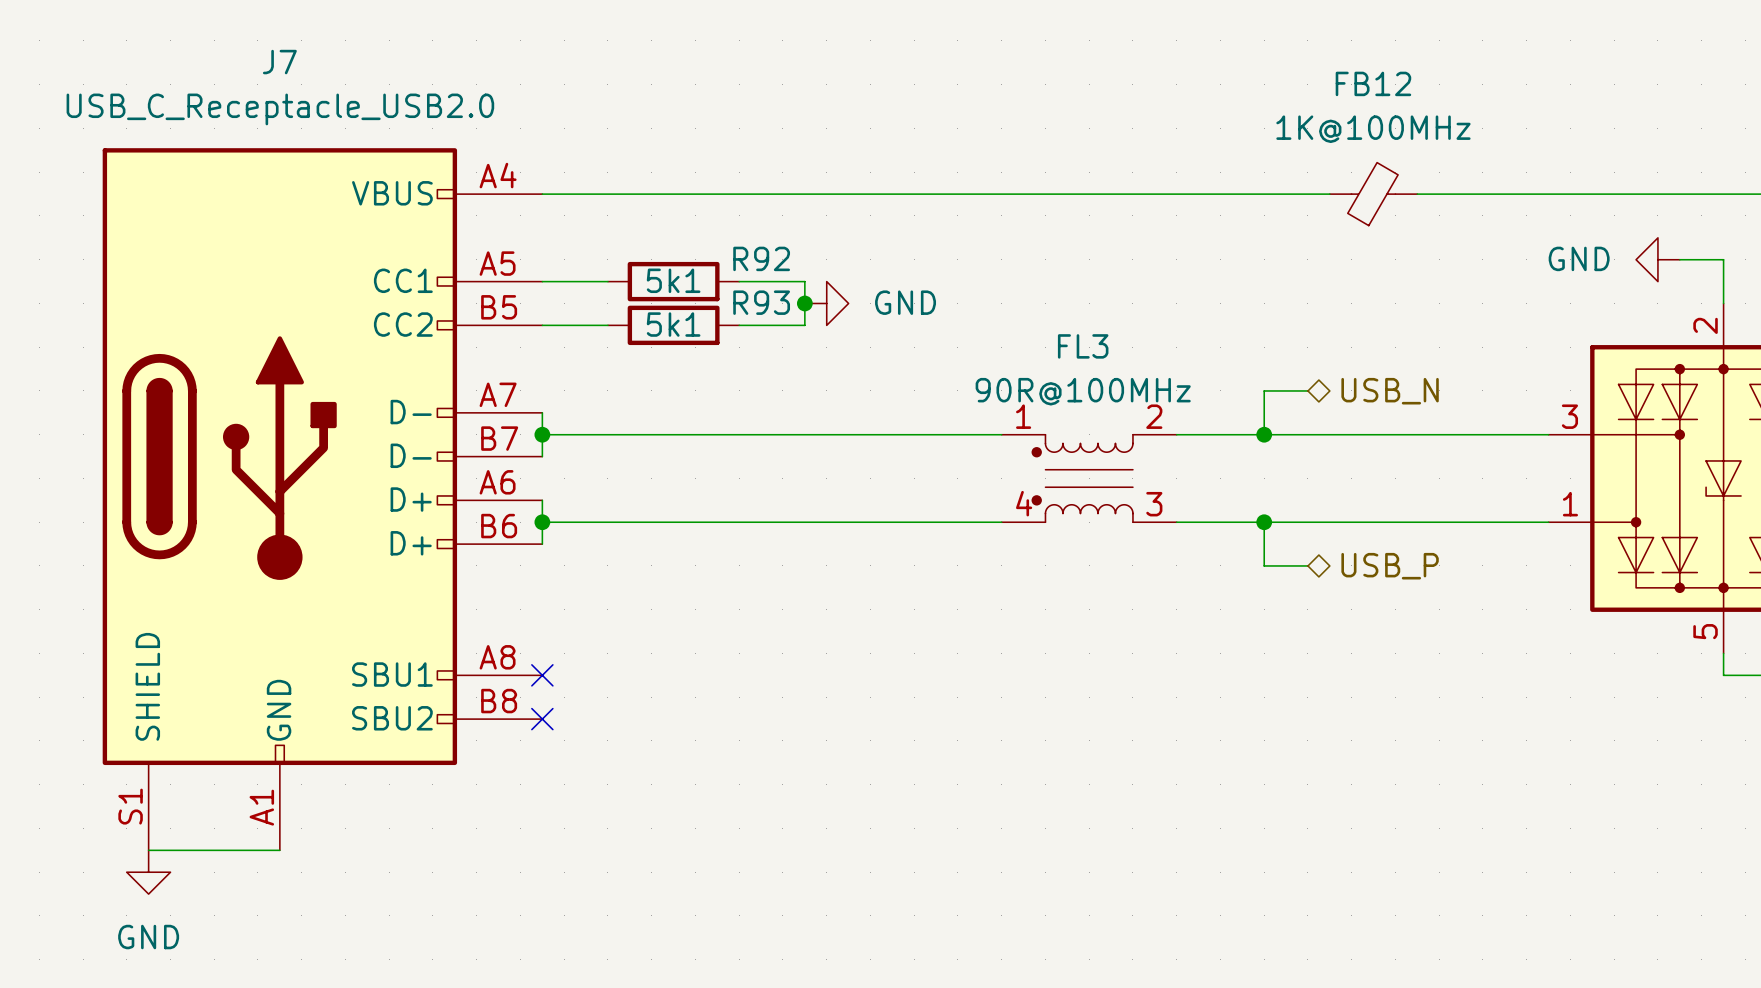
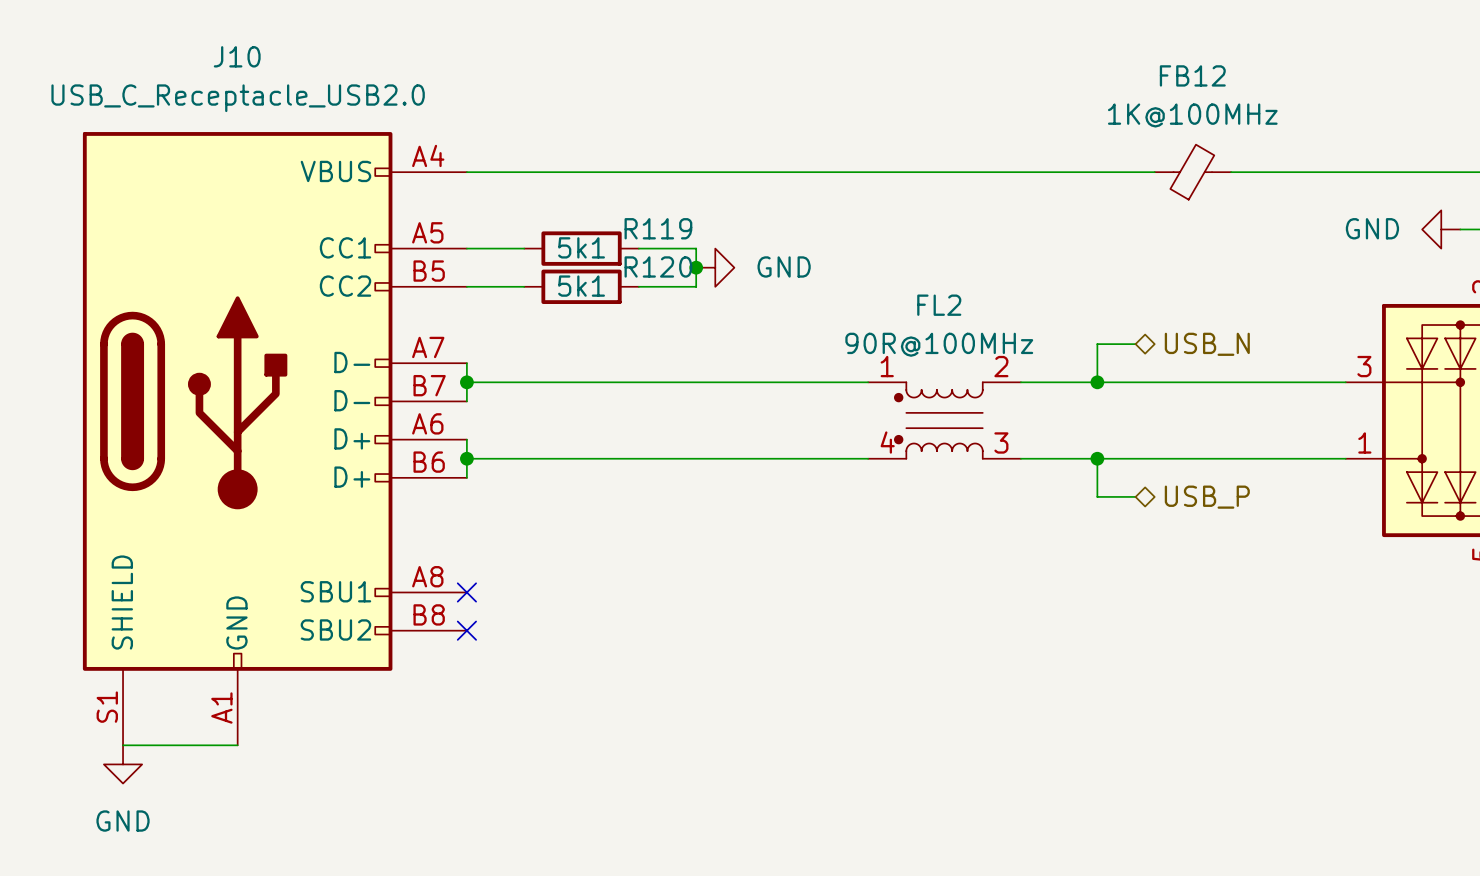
J7 name: J7 (279, 62) -> J10 (237, 56)
R92 name: R92 (761, 258) -> R119 (658, 228)
R93 name: R93 (761, 302) -> R120 (658, 266)
FL3 name: FL3 (1083, 346) -> FL2 (939, 305)

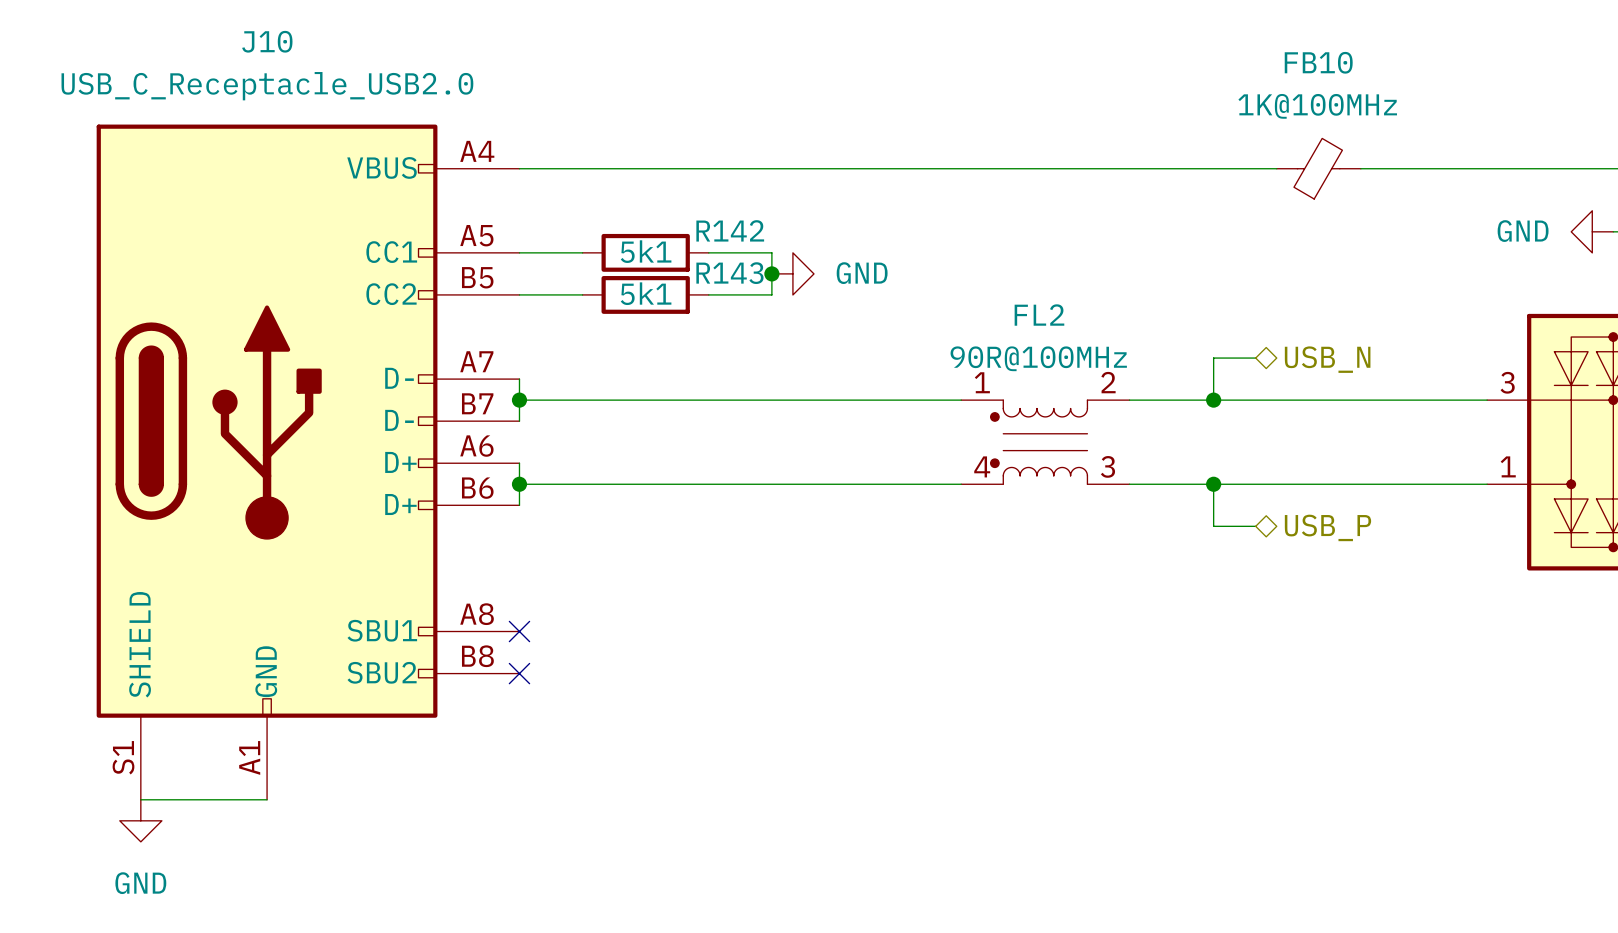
FB12 name: FB12 (1192, 75) -> FB10 (1318, 62)
R119 name: R119 (658, 228) -> R142 (730, 230)
R120 name: R120 (658, 266) -> R143 (729, 273)

